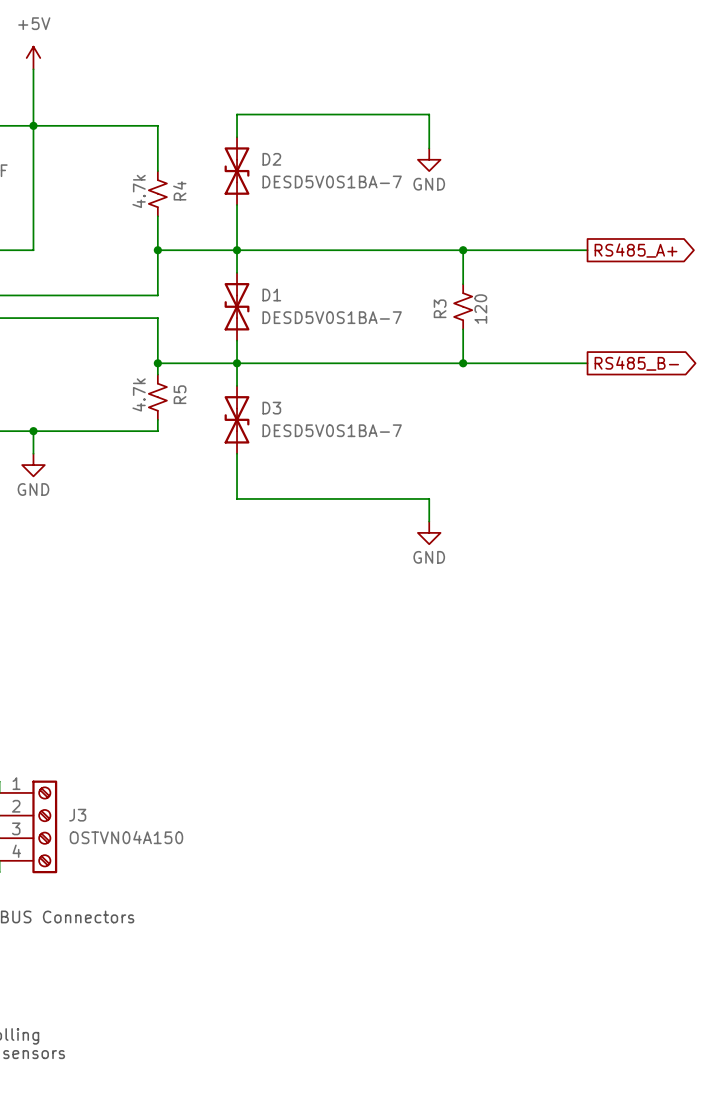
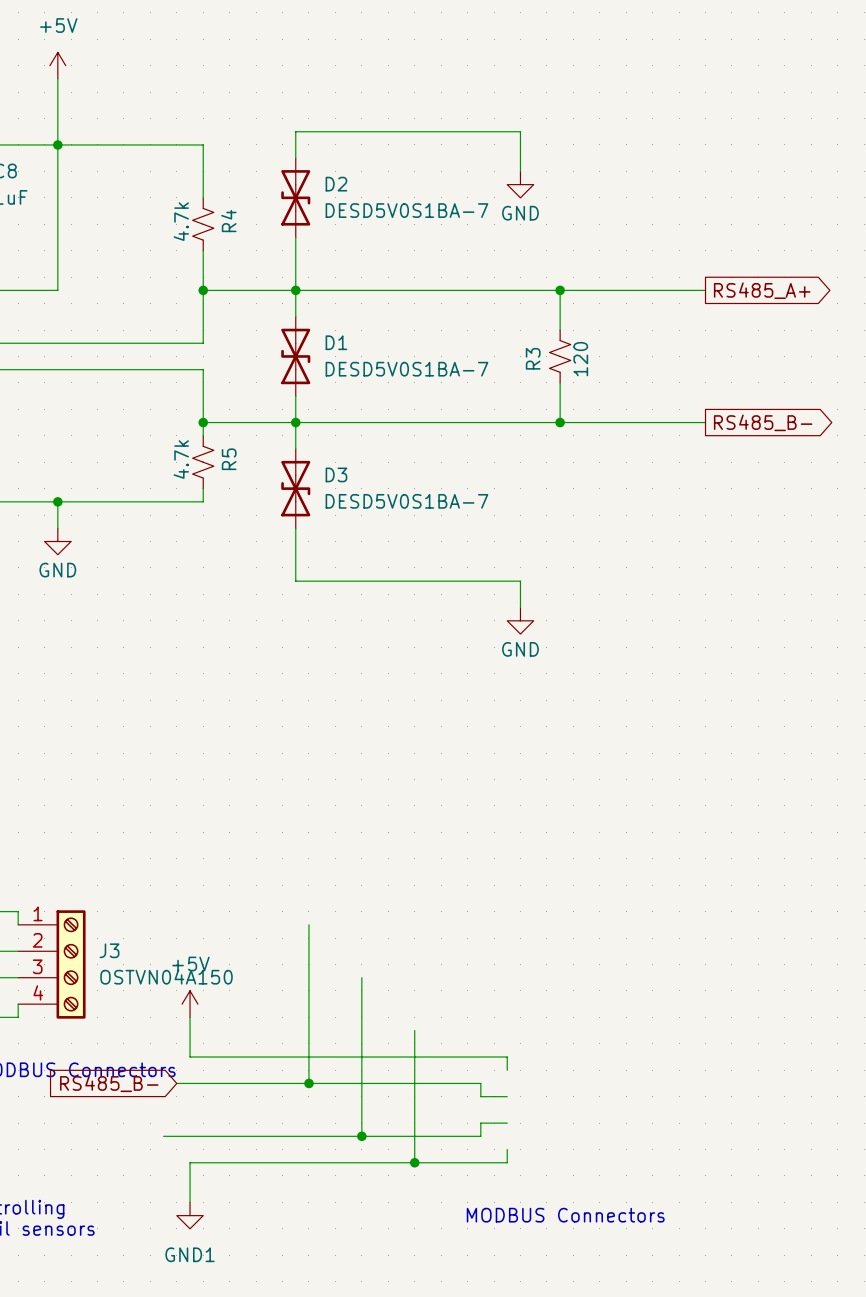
wire: none -> (308, 924) (308, 1083)
wire: none -> (361, 977) (361, 1136)
power symbol: none -> +5V (190, 1004)
wire: none -> (190, 1017) (190, 1057) (507, 1057) (507, 1070)
wire: none -> (414, 1030) (414, 1162)
global label: none -> RS485_B- (109, 1083)
wire: none -> (176, 1083) (480, 1083) (480, 1096) (507, 1096)
junction: none -> (308, 1083)
wire: none -> (507, 1123) (480, 1123) (480, 1136) (163, 1136)
junction: none -> (361, 1136)
wire: none -> (507, 1149) (507, 1162) (190, 1162) (190, 1202)
junction: none -> (414, 1162)
power symbol: none -> GND1 (190, 1215)
text: none -> MODBUS Connectors (565, 1215)

